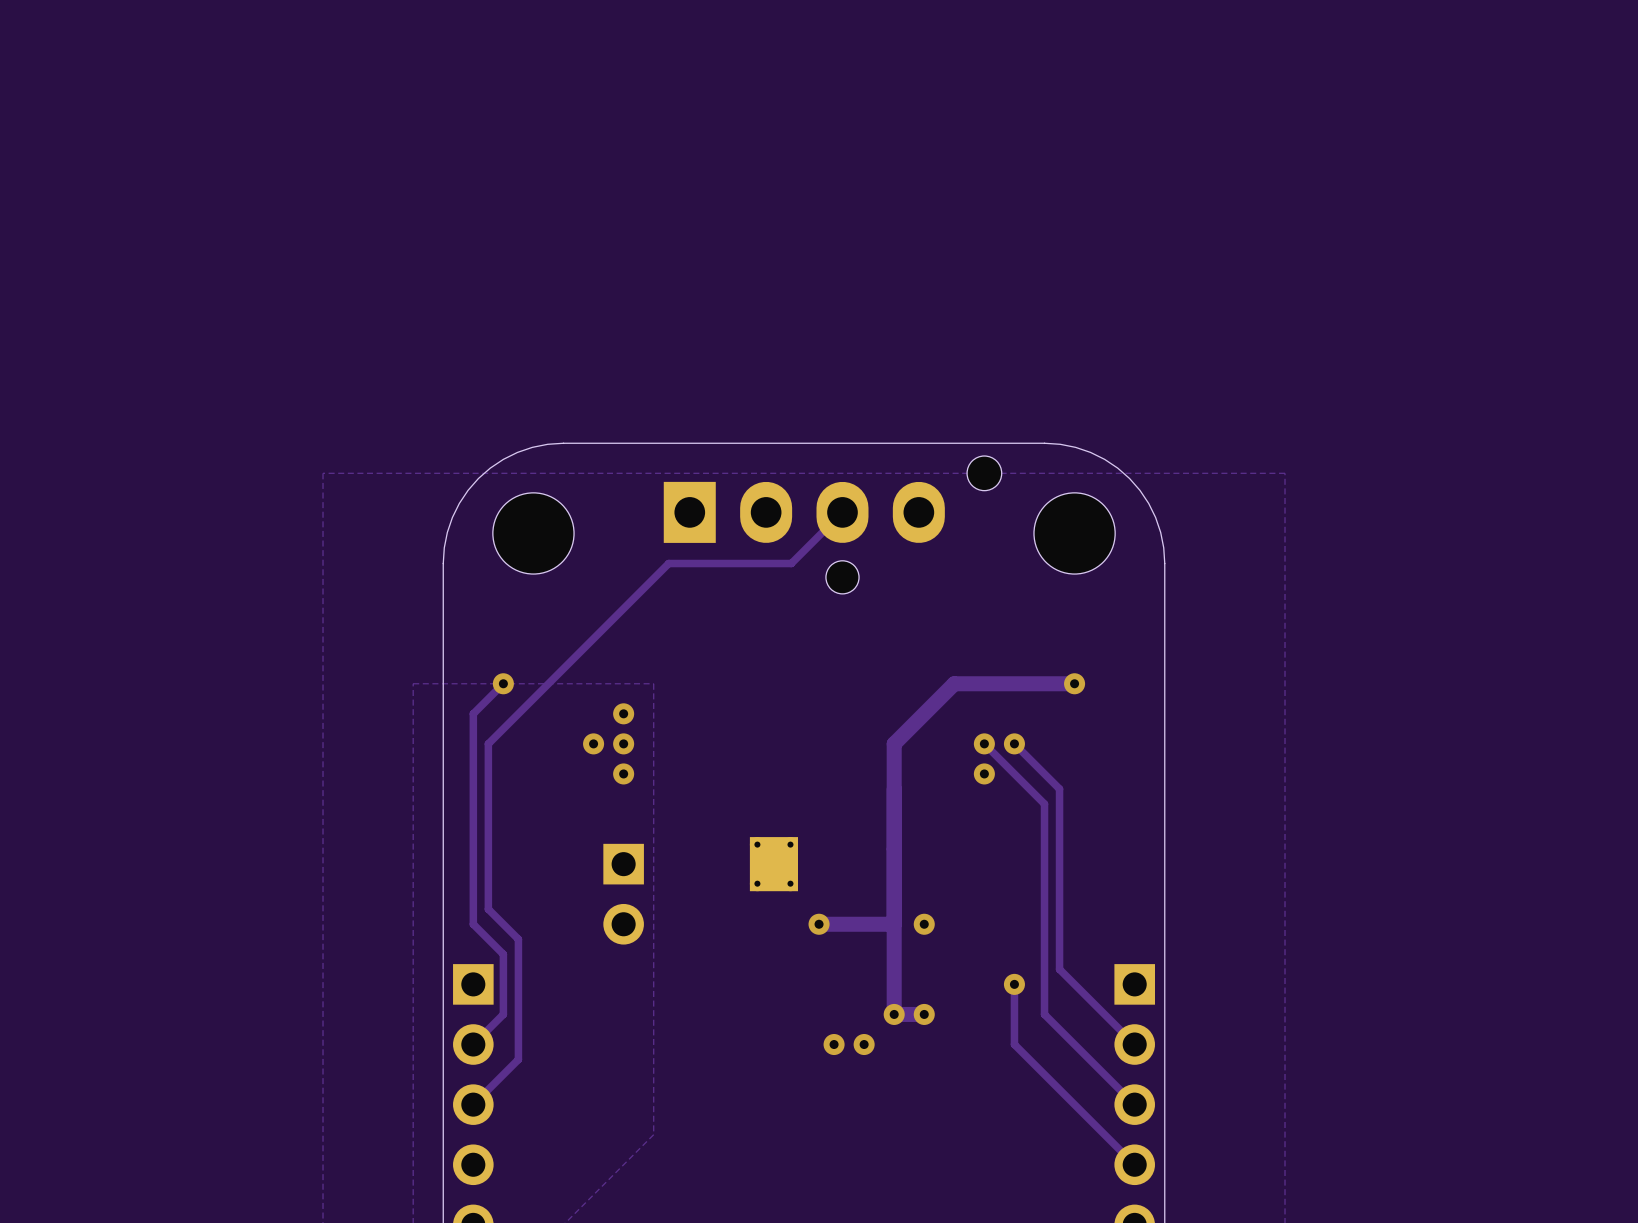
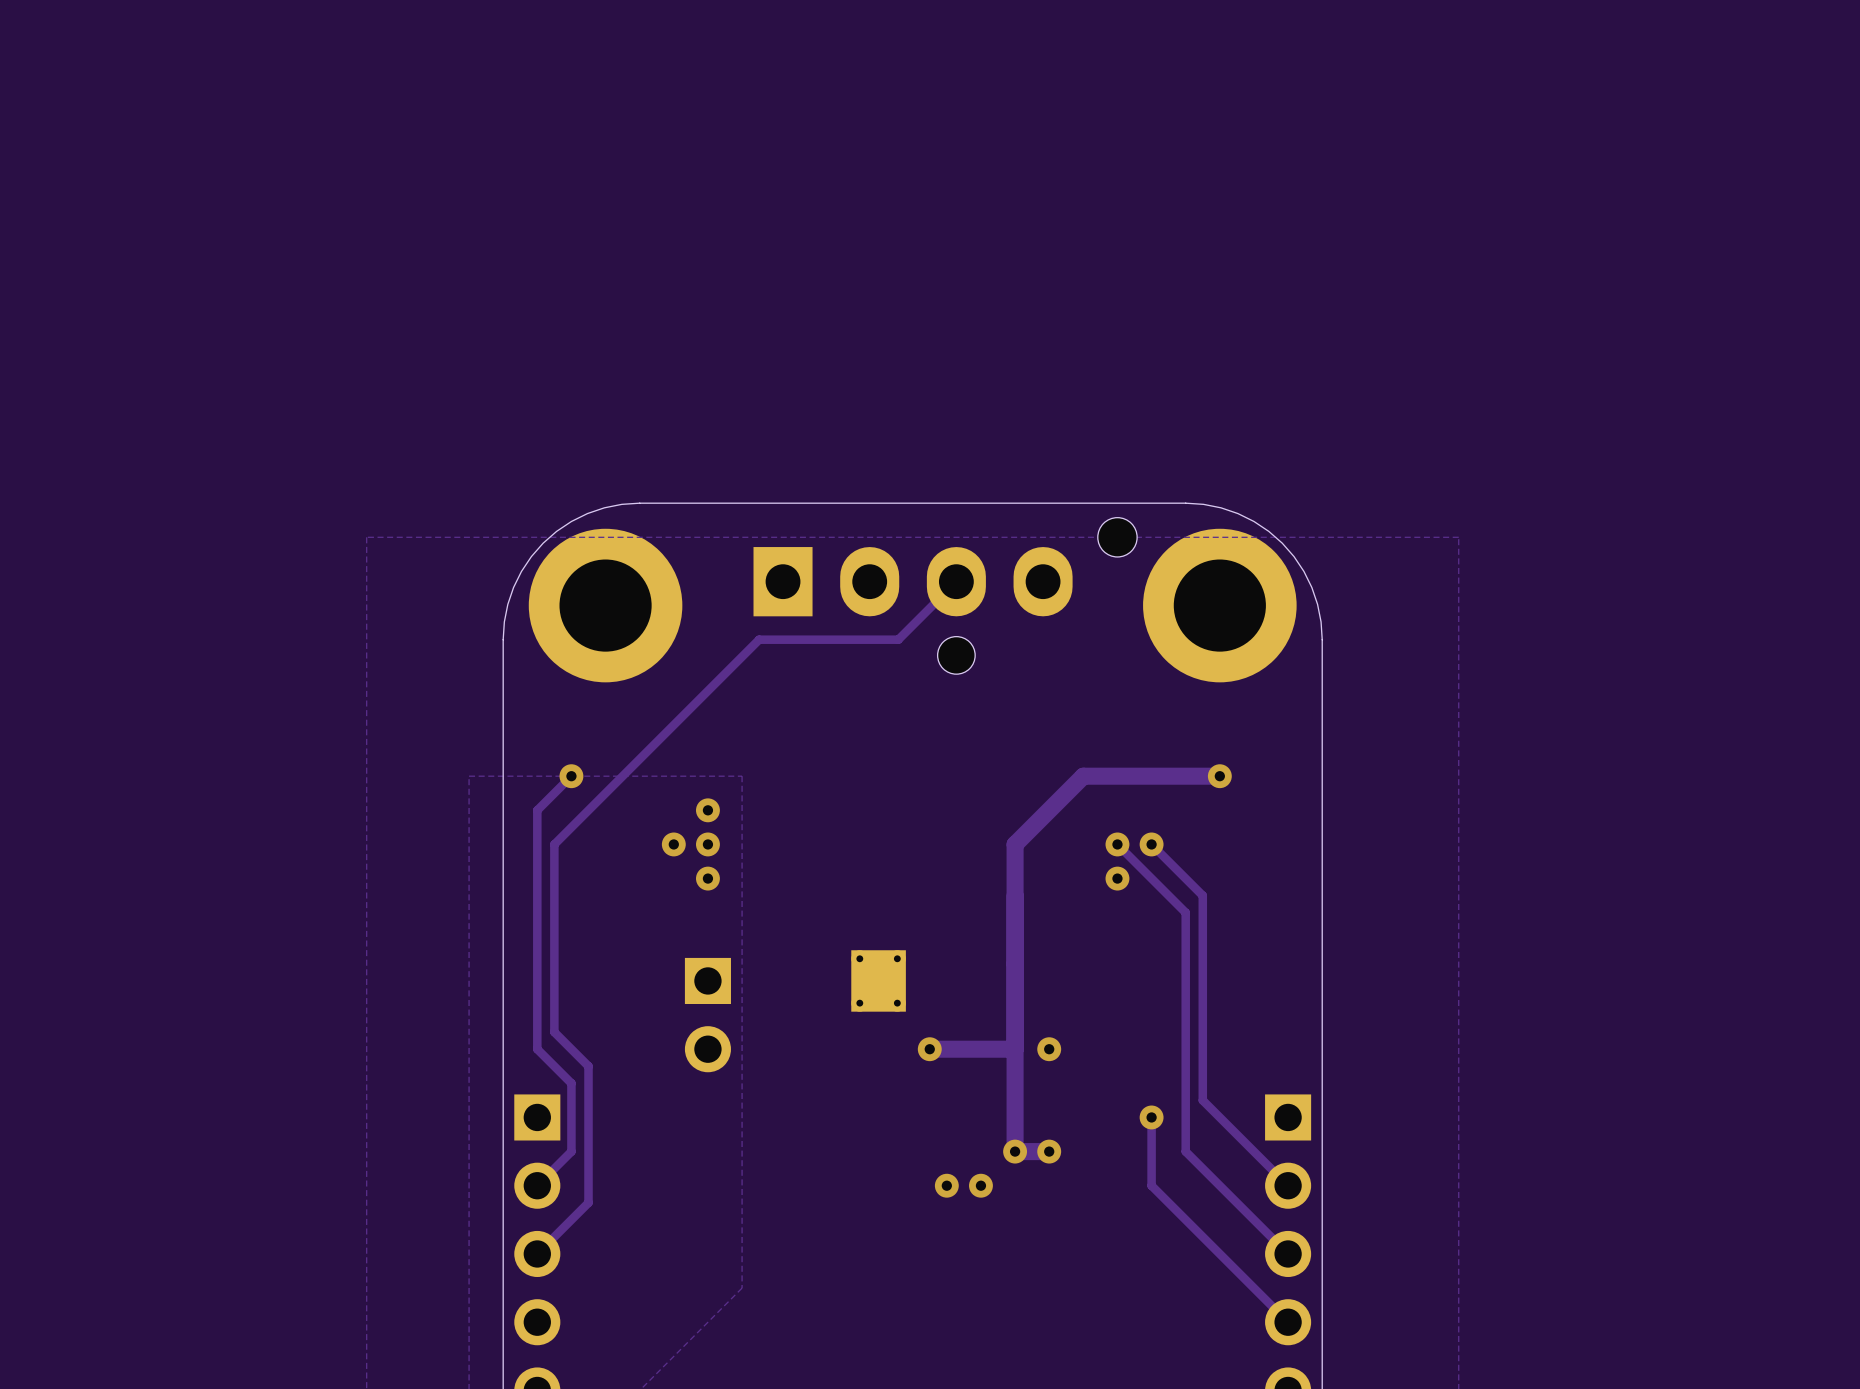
part footprint: [492, 492, 575, 575] -> [528, 528, 683, 683]
part footprint: [1033, 492, 1116, 575] -> [1143, 528, 1297, 683]

